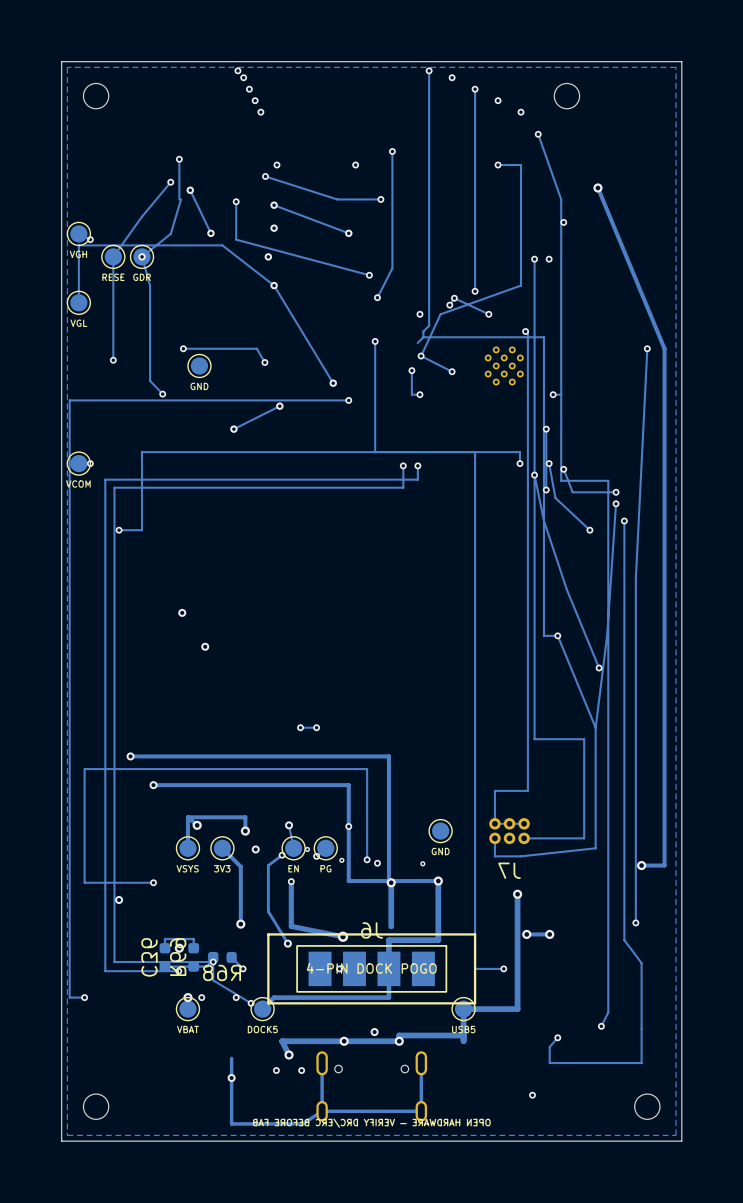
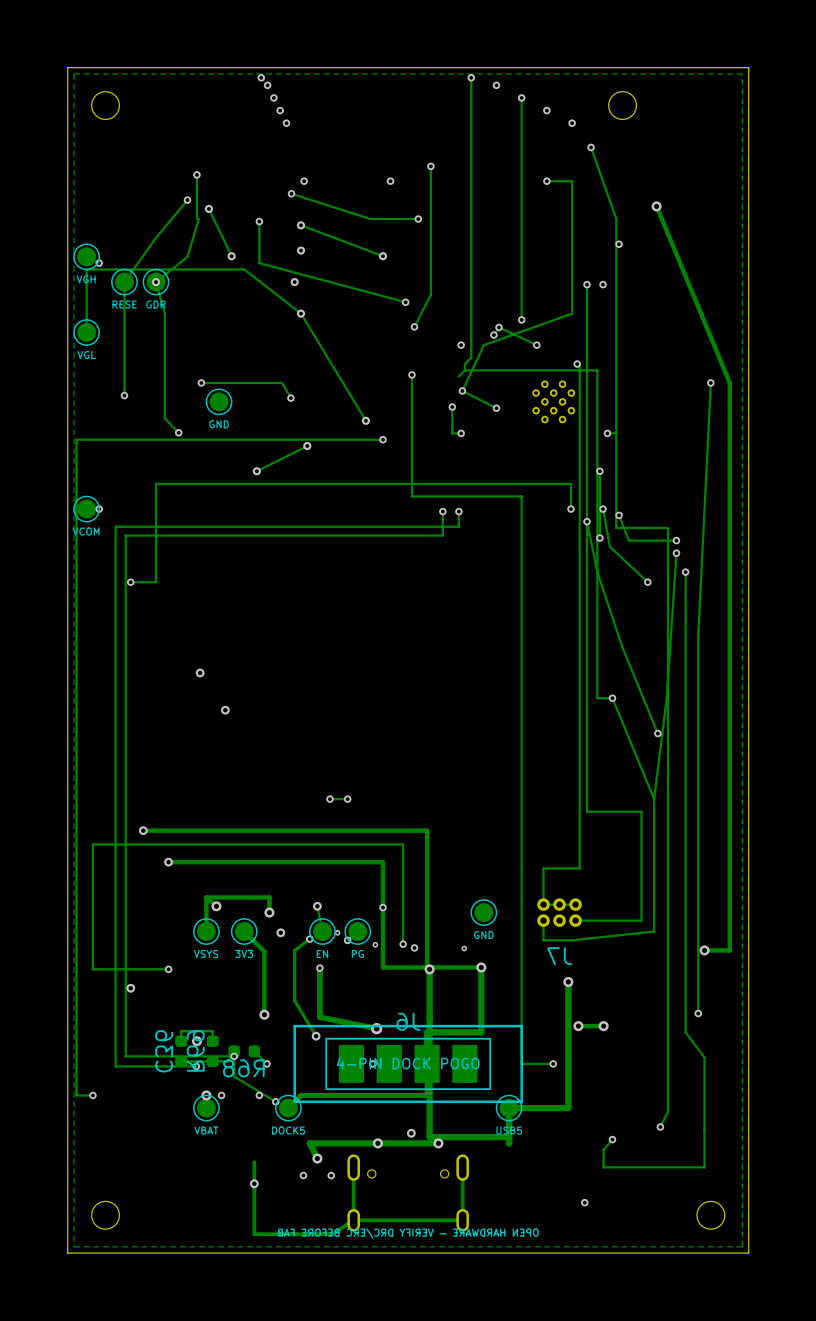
track: (375, 452) (142, 452) -> (570, 496) (570, 483) (155, 483) (155, 496)
track: (519, 452) (475, 452) -> none
track: none -> (429, 1017) (429, 1137) (438, 1137)

